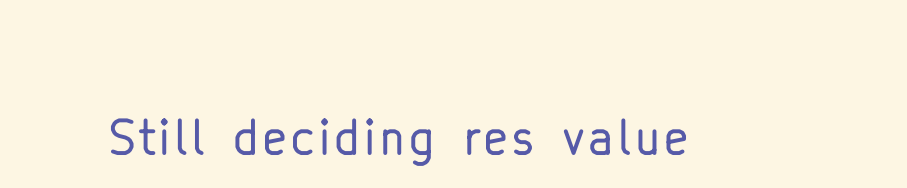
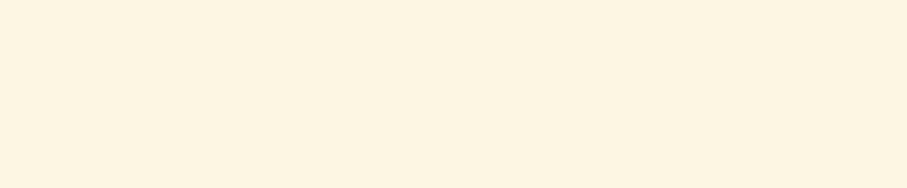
text: Still deciding res value (398, 142) -> none

